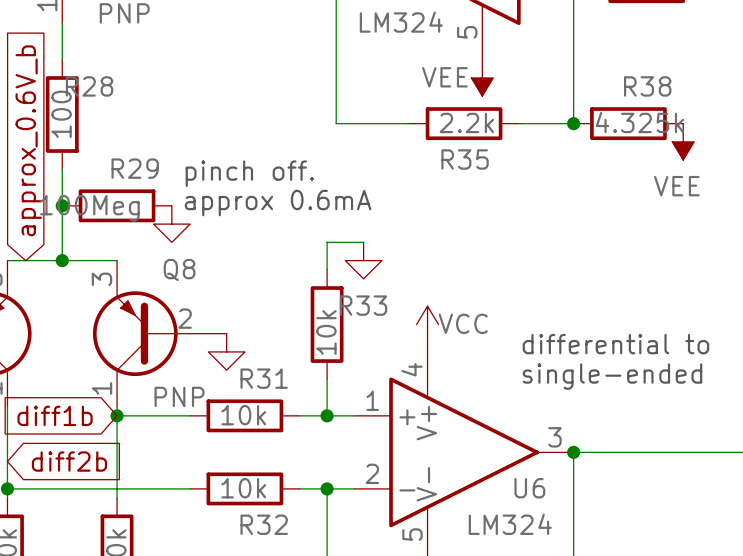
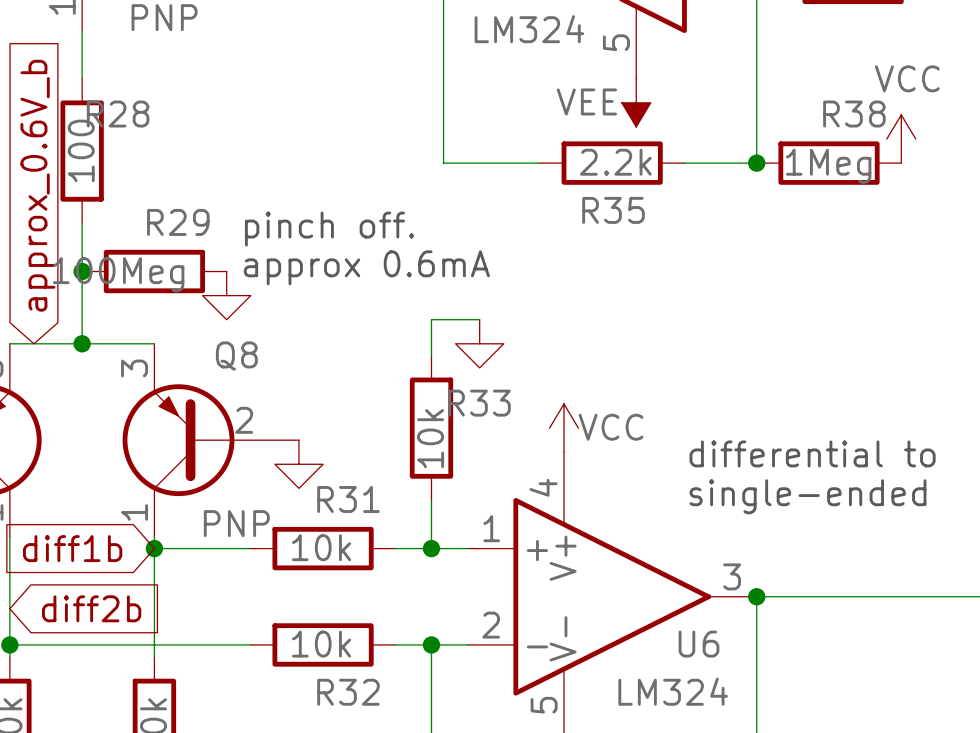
power symbol: none -> VCC (901, 139)
R38 value: 4.325k (639, 122) -> 1Meg (828, 166)
power symbol: VEE (683, 141) -> none

